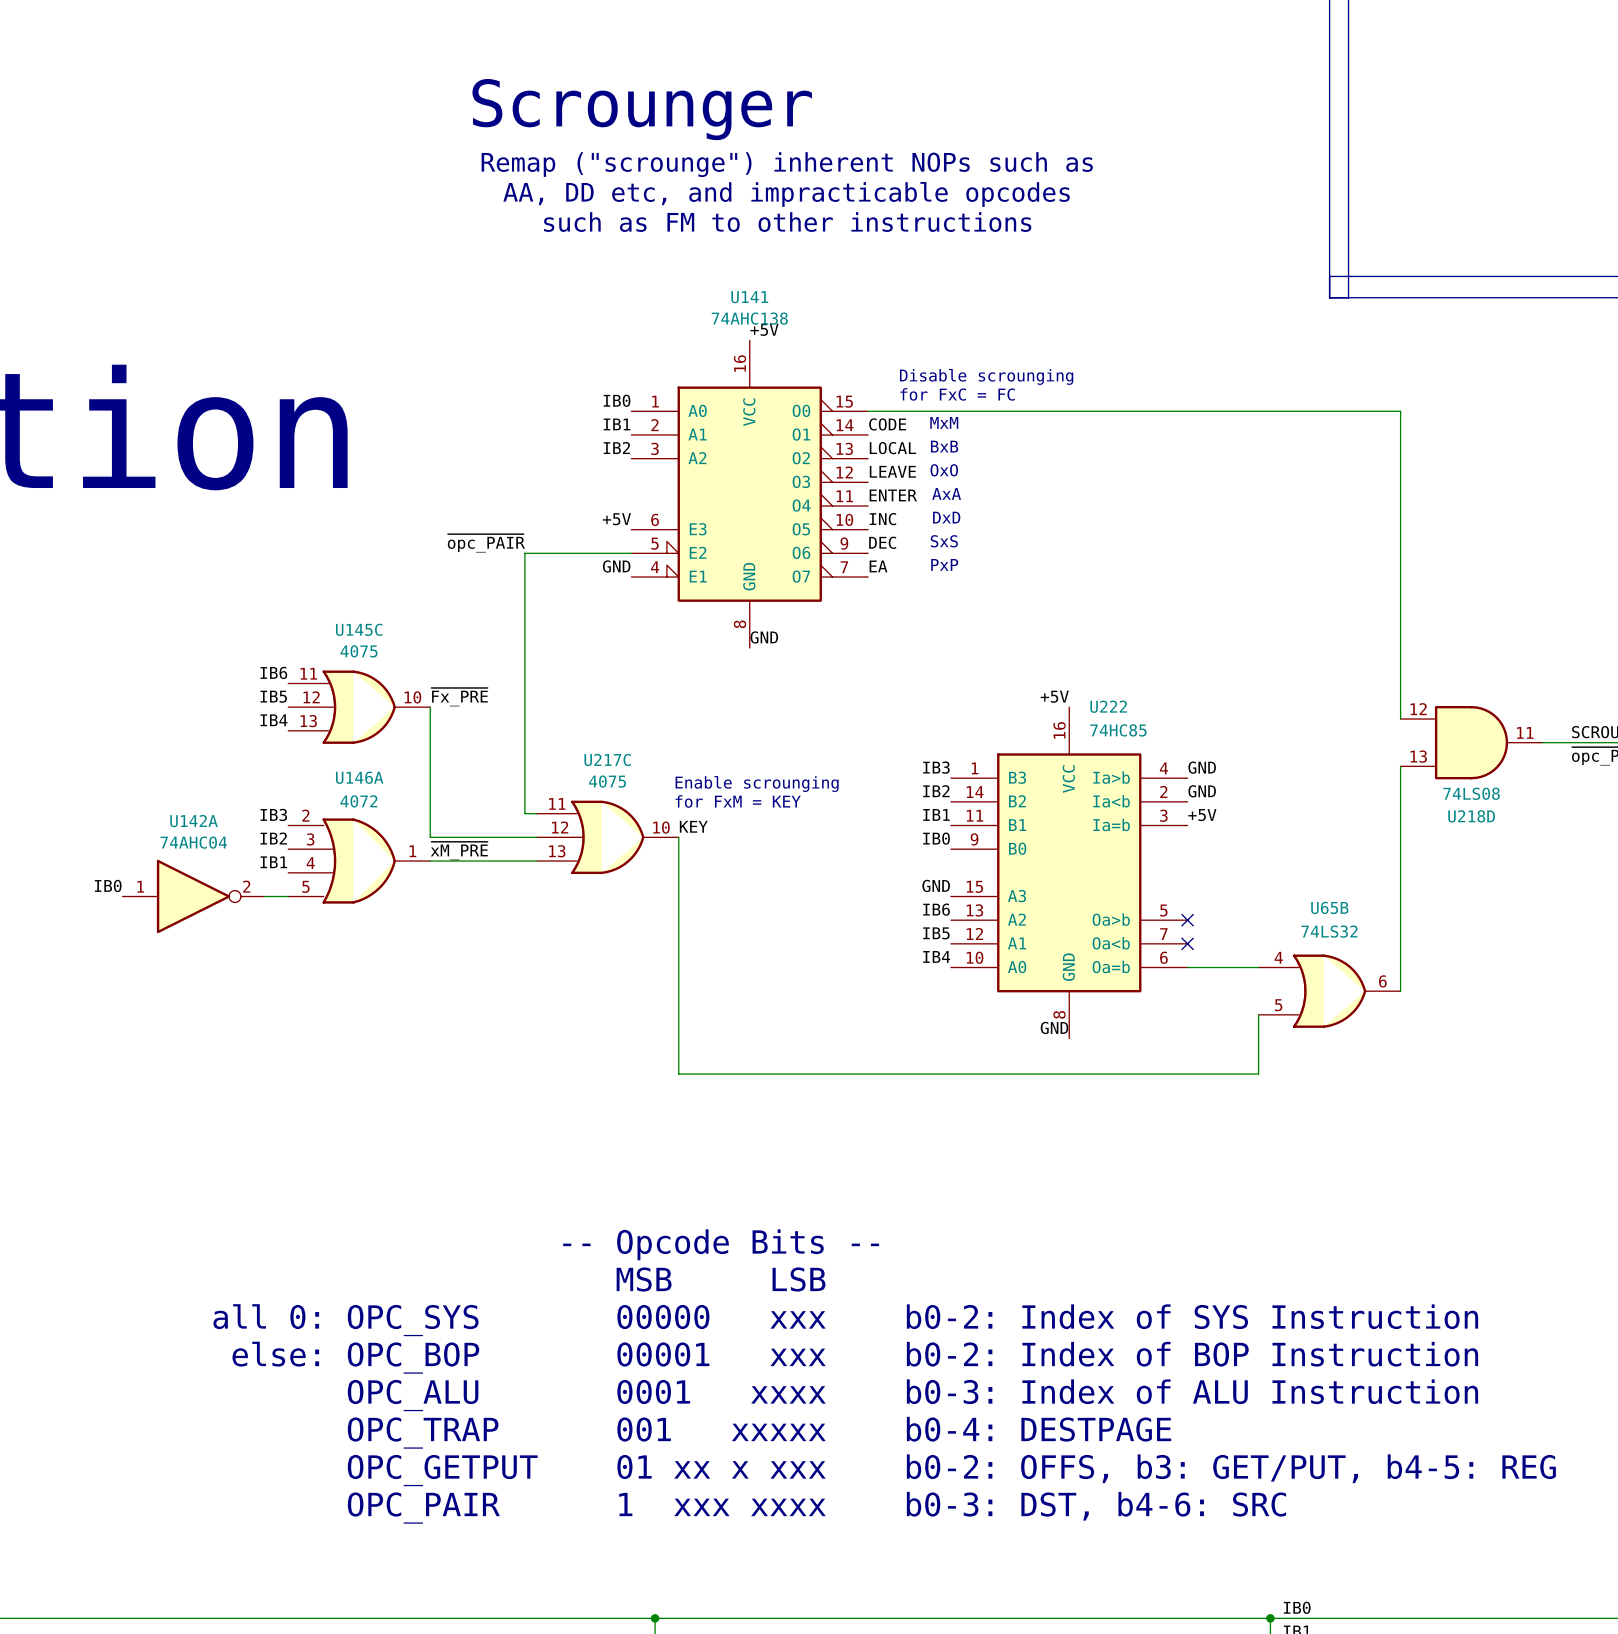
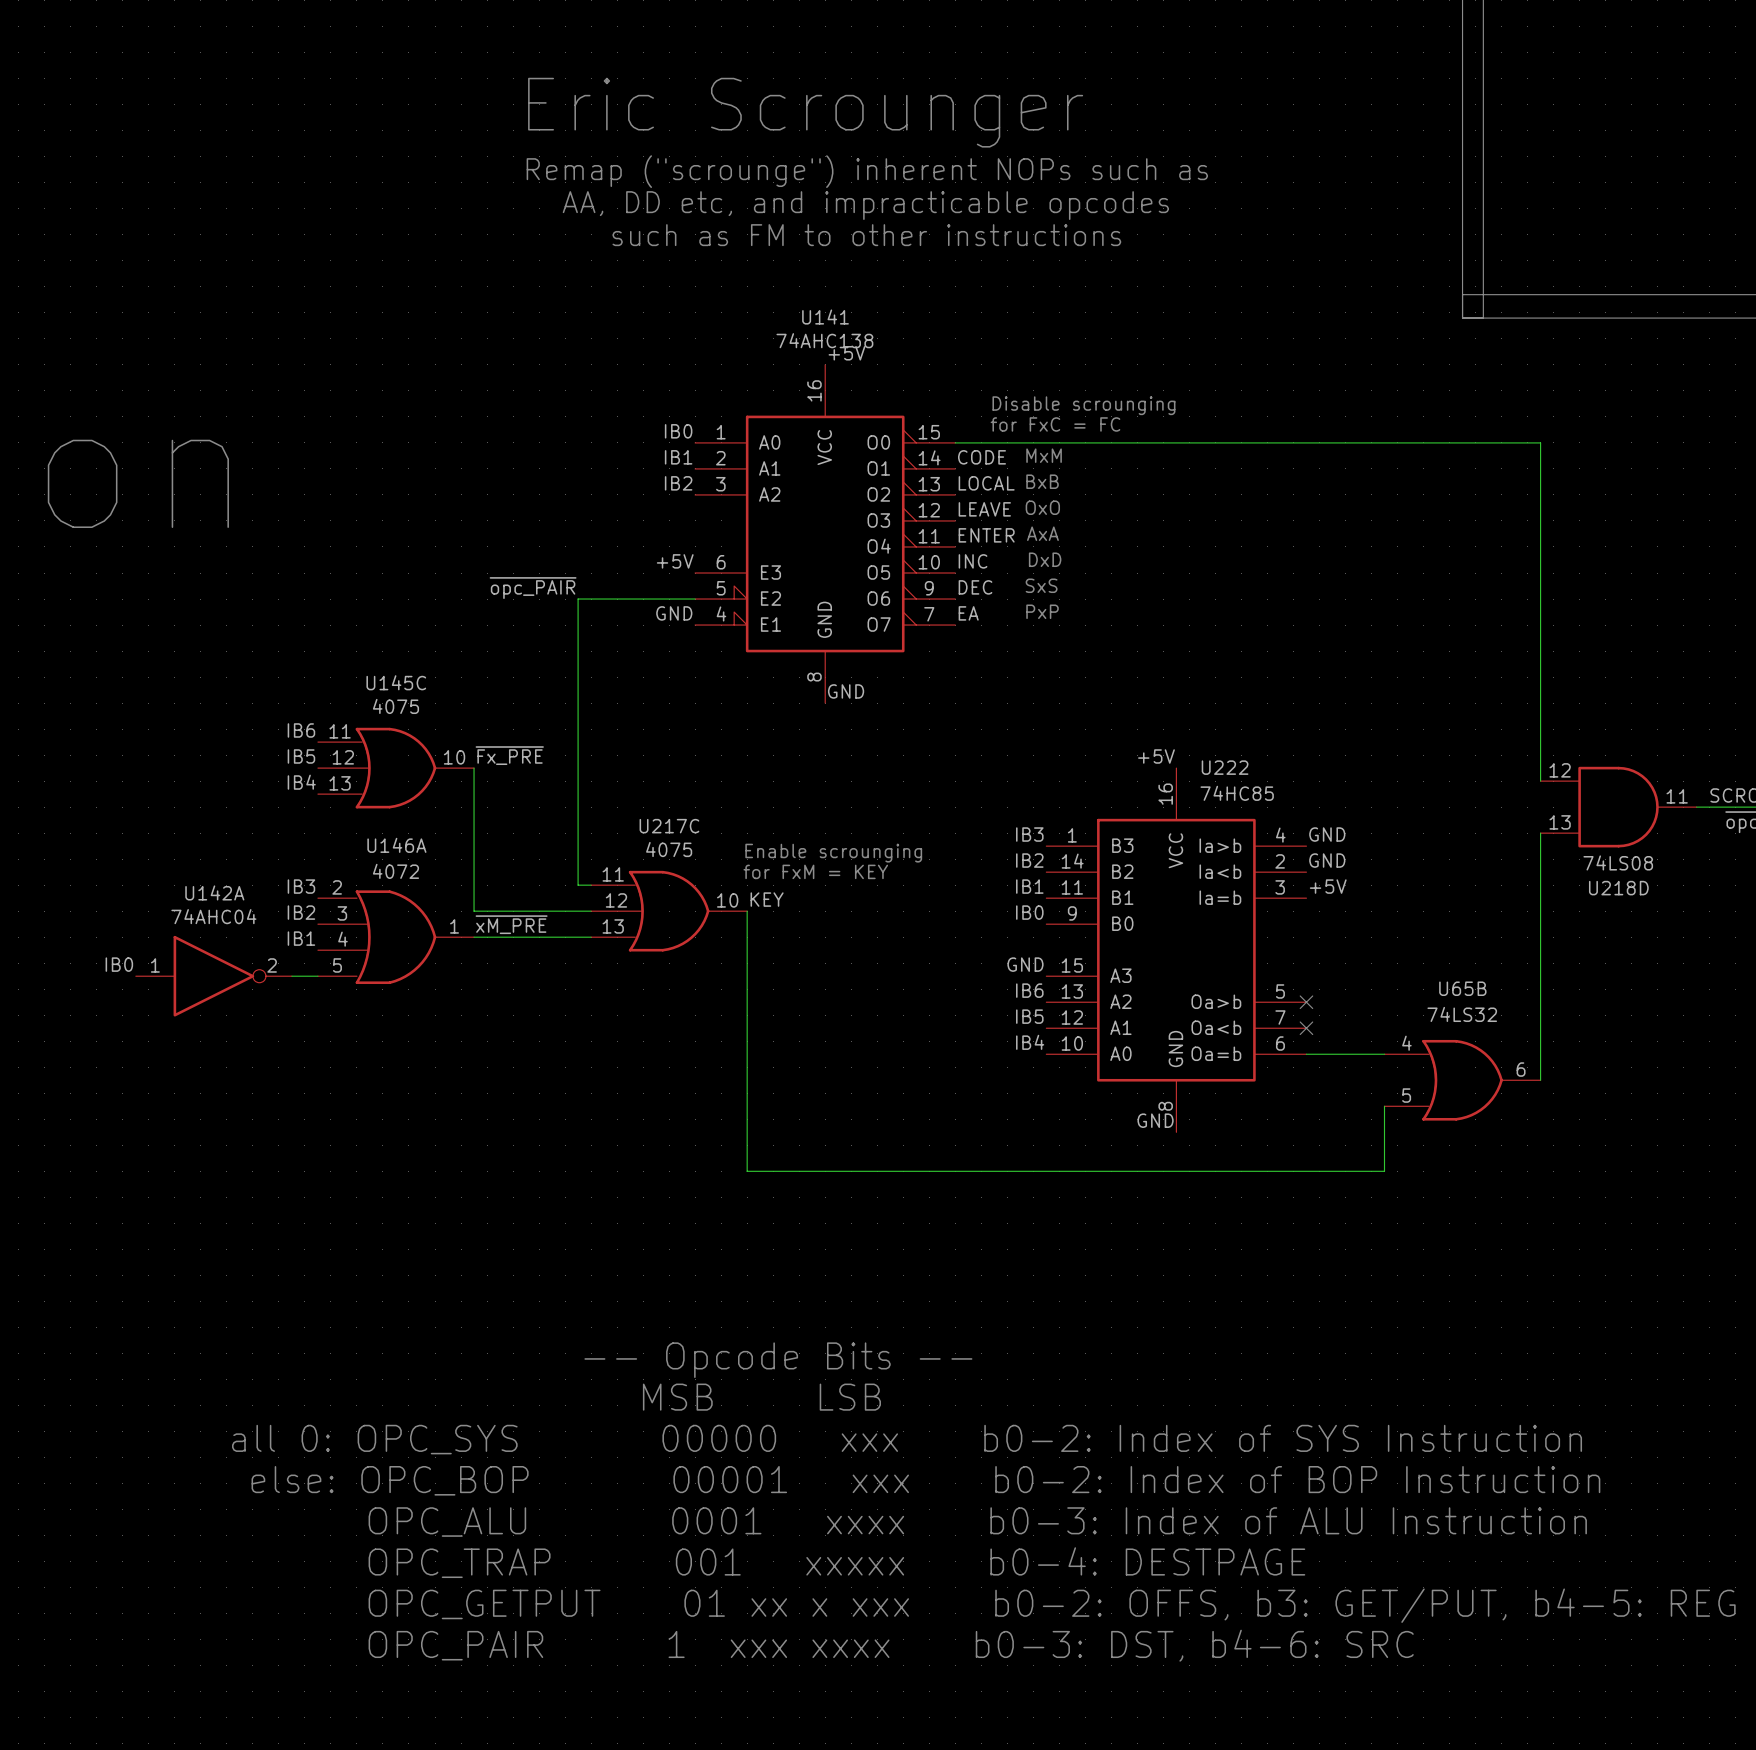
text: Scrounger (642, 109) -> Eric Scrounger (805, 112)

